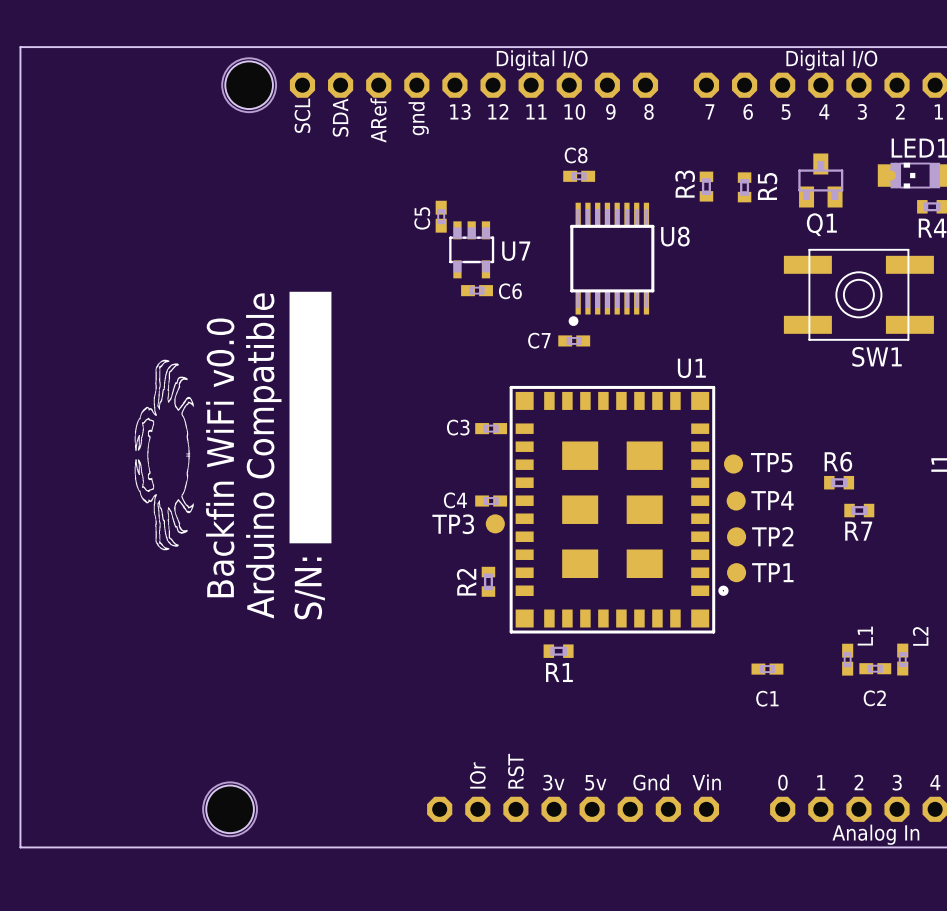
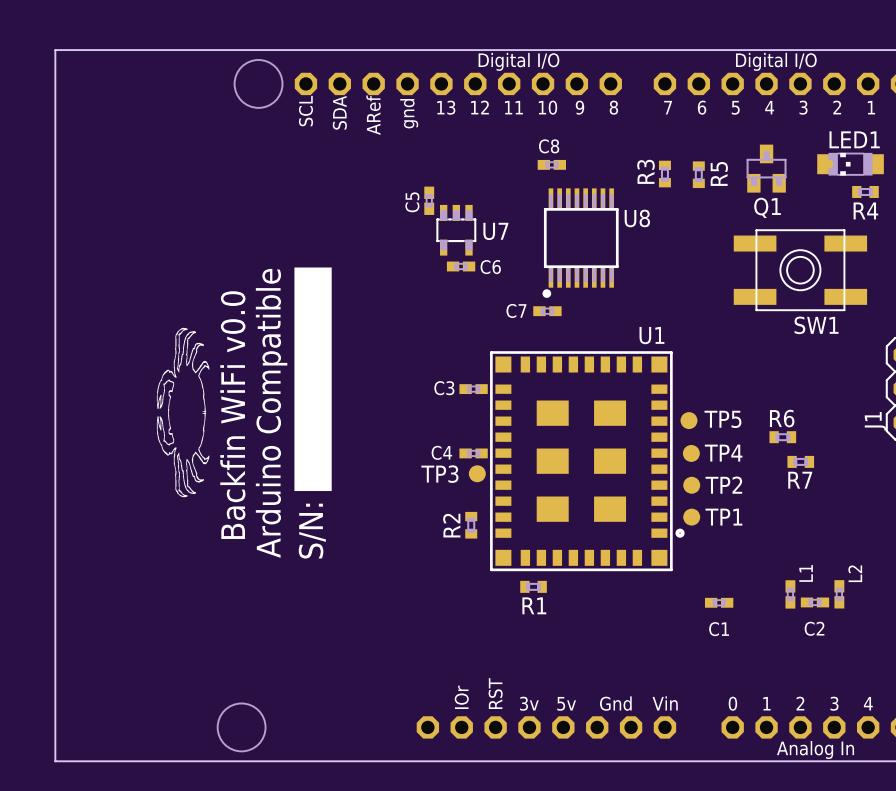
hole: (249, 85) -> none
hole: (230, 809) -> none

